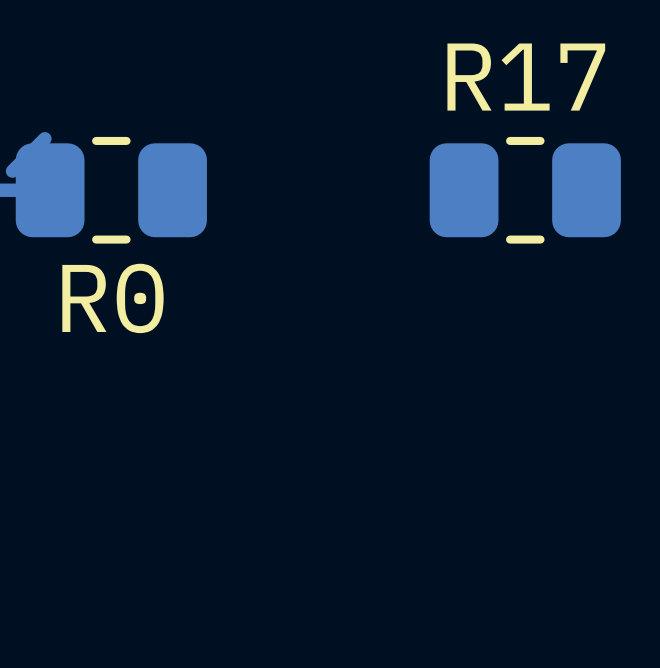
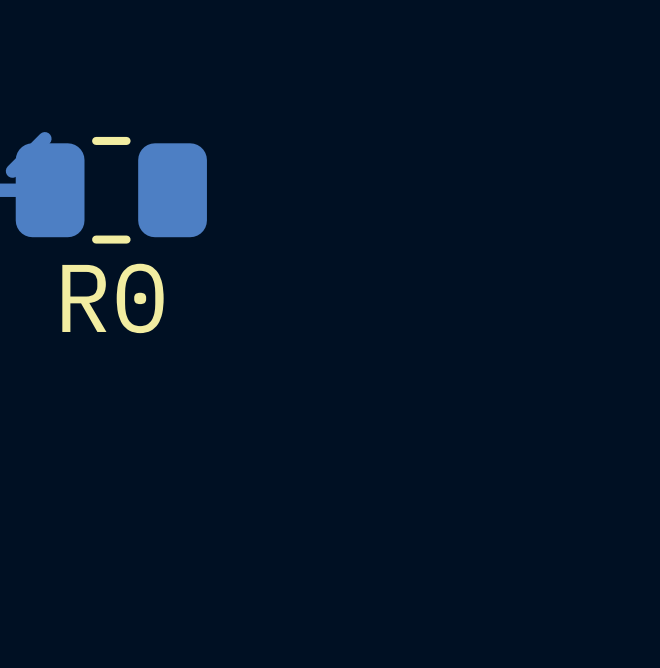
R17: (525, 190) -> none

